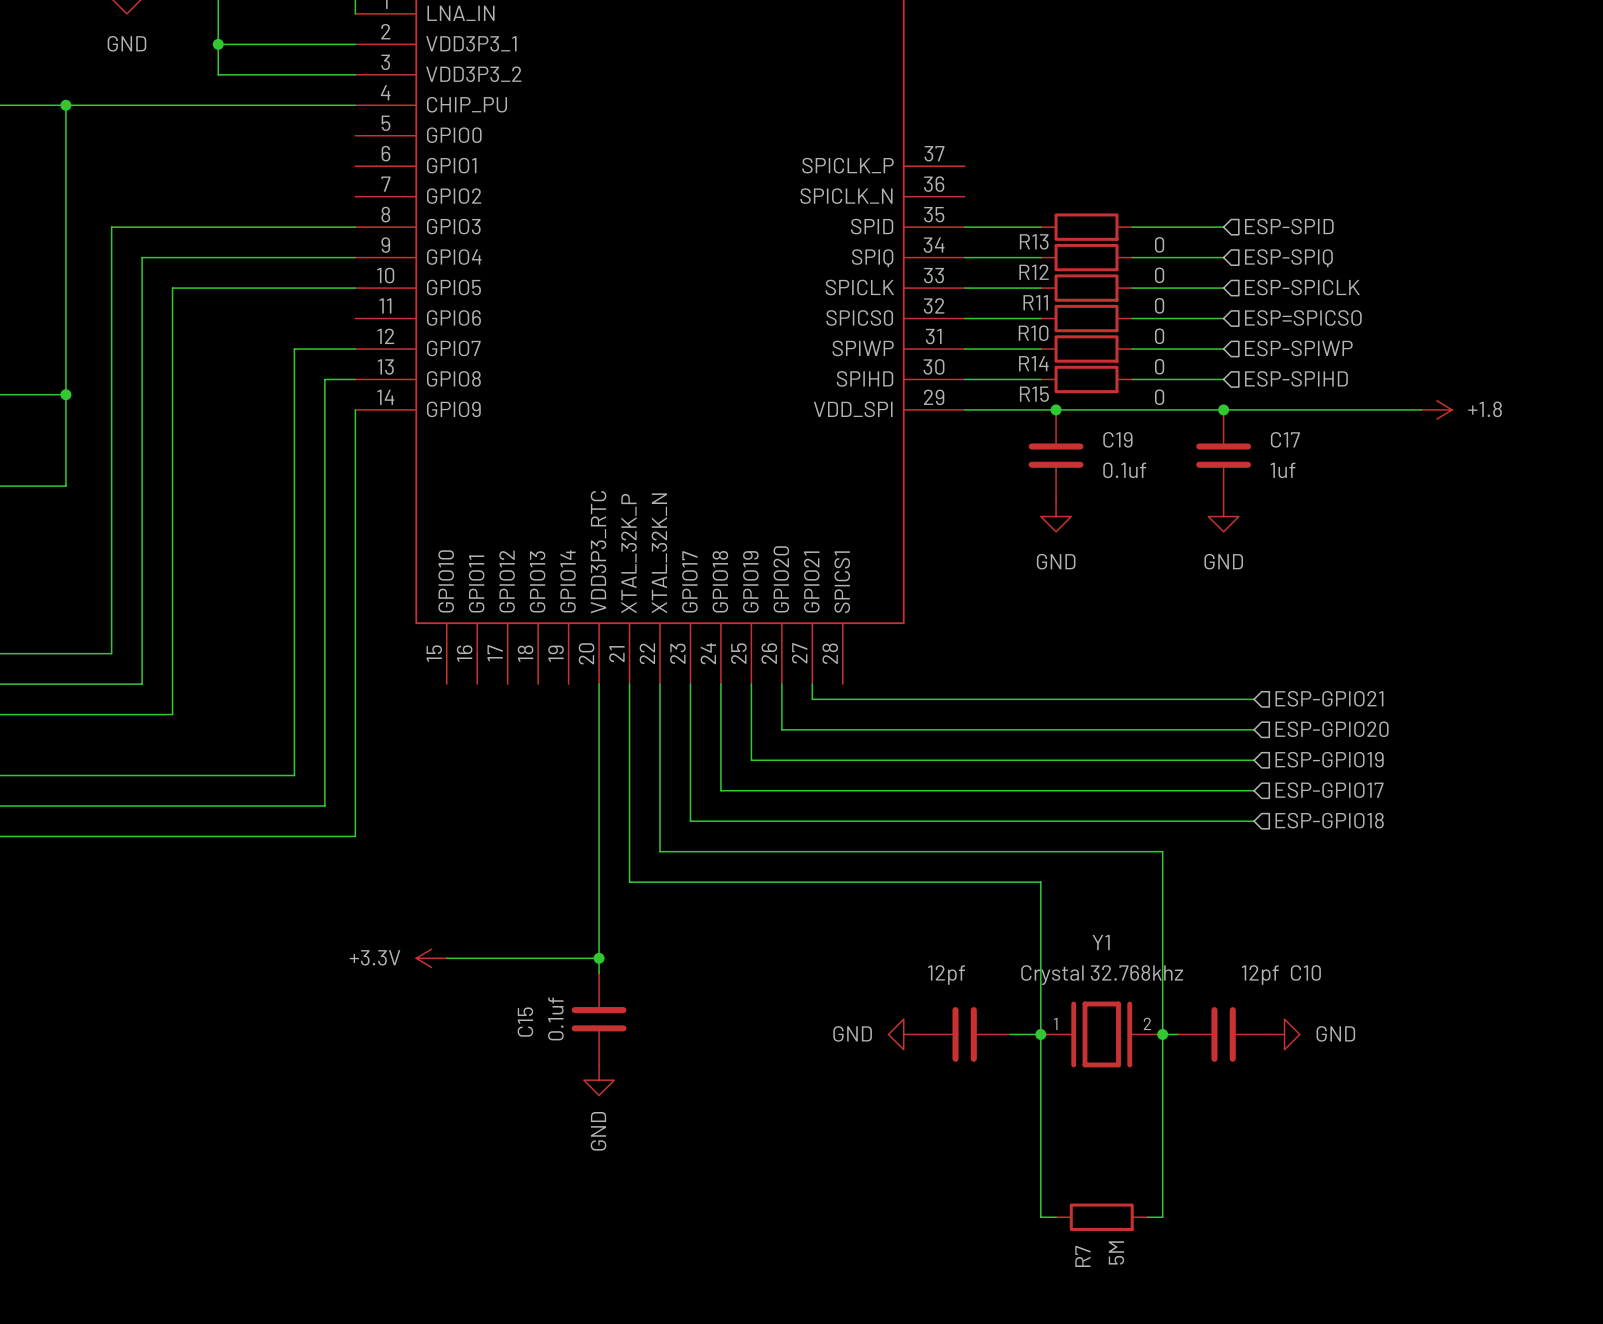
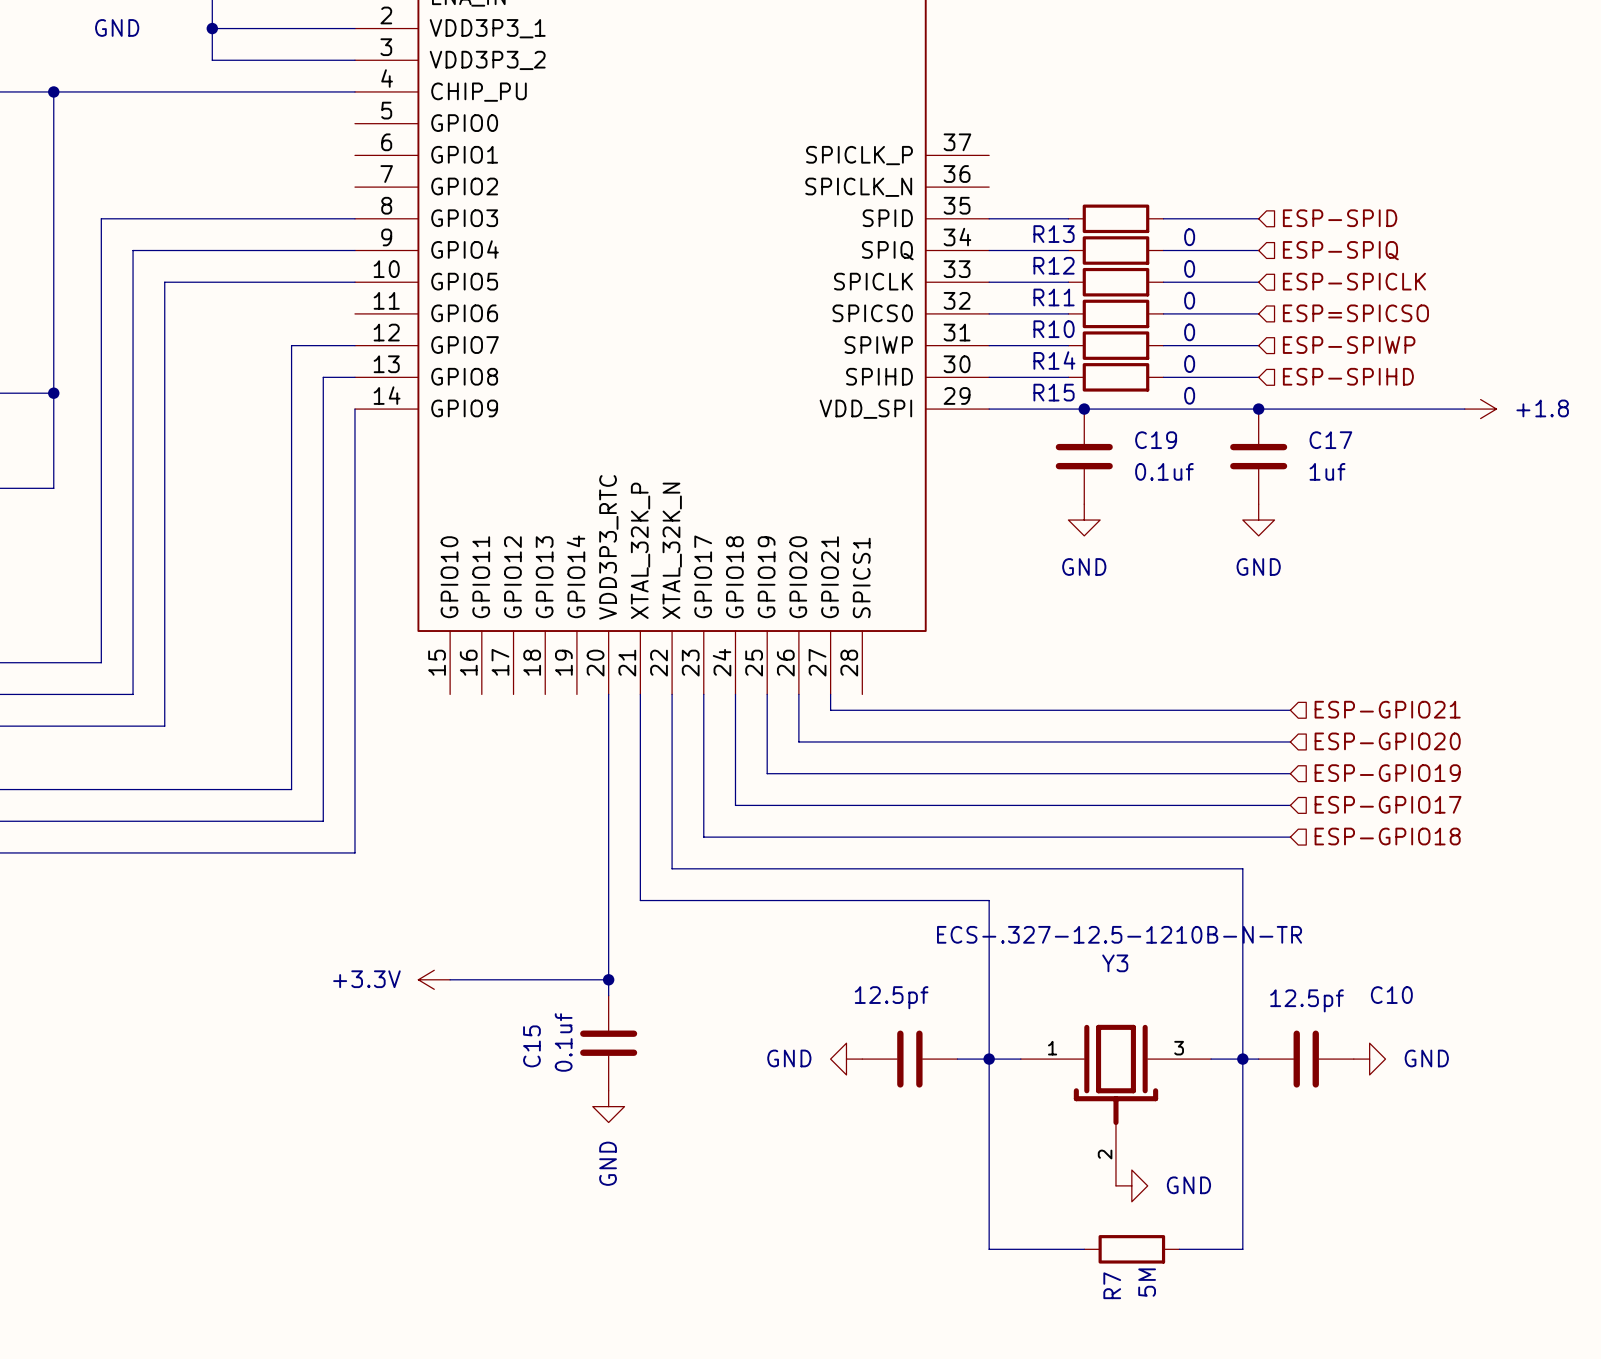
wire: (1162, 851) (1162, 1217) -> (1195, 868) (1242, 868) (1242, 1249) (1195, 1249)
wire: (964, 882) (1040, 882) (1040, 1217) -> (989, 900) (989, 1249) (1068, 1249)
C10 value: 12pf (1260, 974) -> 12.5pf (1306, 1000)
part: none -> 12.5pf (909, 1059)
power symbol position: GND (903, 1034) -> GND (846, 1059)
junction: none -> (989, 1059)
part: 12pf (964, 1034) -> none
junction: (1040, 1034) -> none
Y1: Crystal 32.768khz (1101, 1034) -> none
junction position: (1162, 1034) -> (1242, 1059)
C10 position: (1223, 1034) -> (1306, 1059)
power symbol position: GND (1284, 1034) -> GND (1369, 1059)
Y3: none -> ECS-.327-12.5-1210B-N-TR (1115, 1105)
power symbol: none -> GND (1131, 1185)

